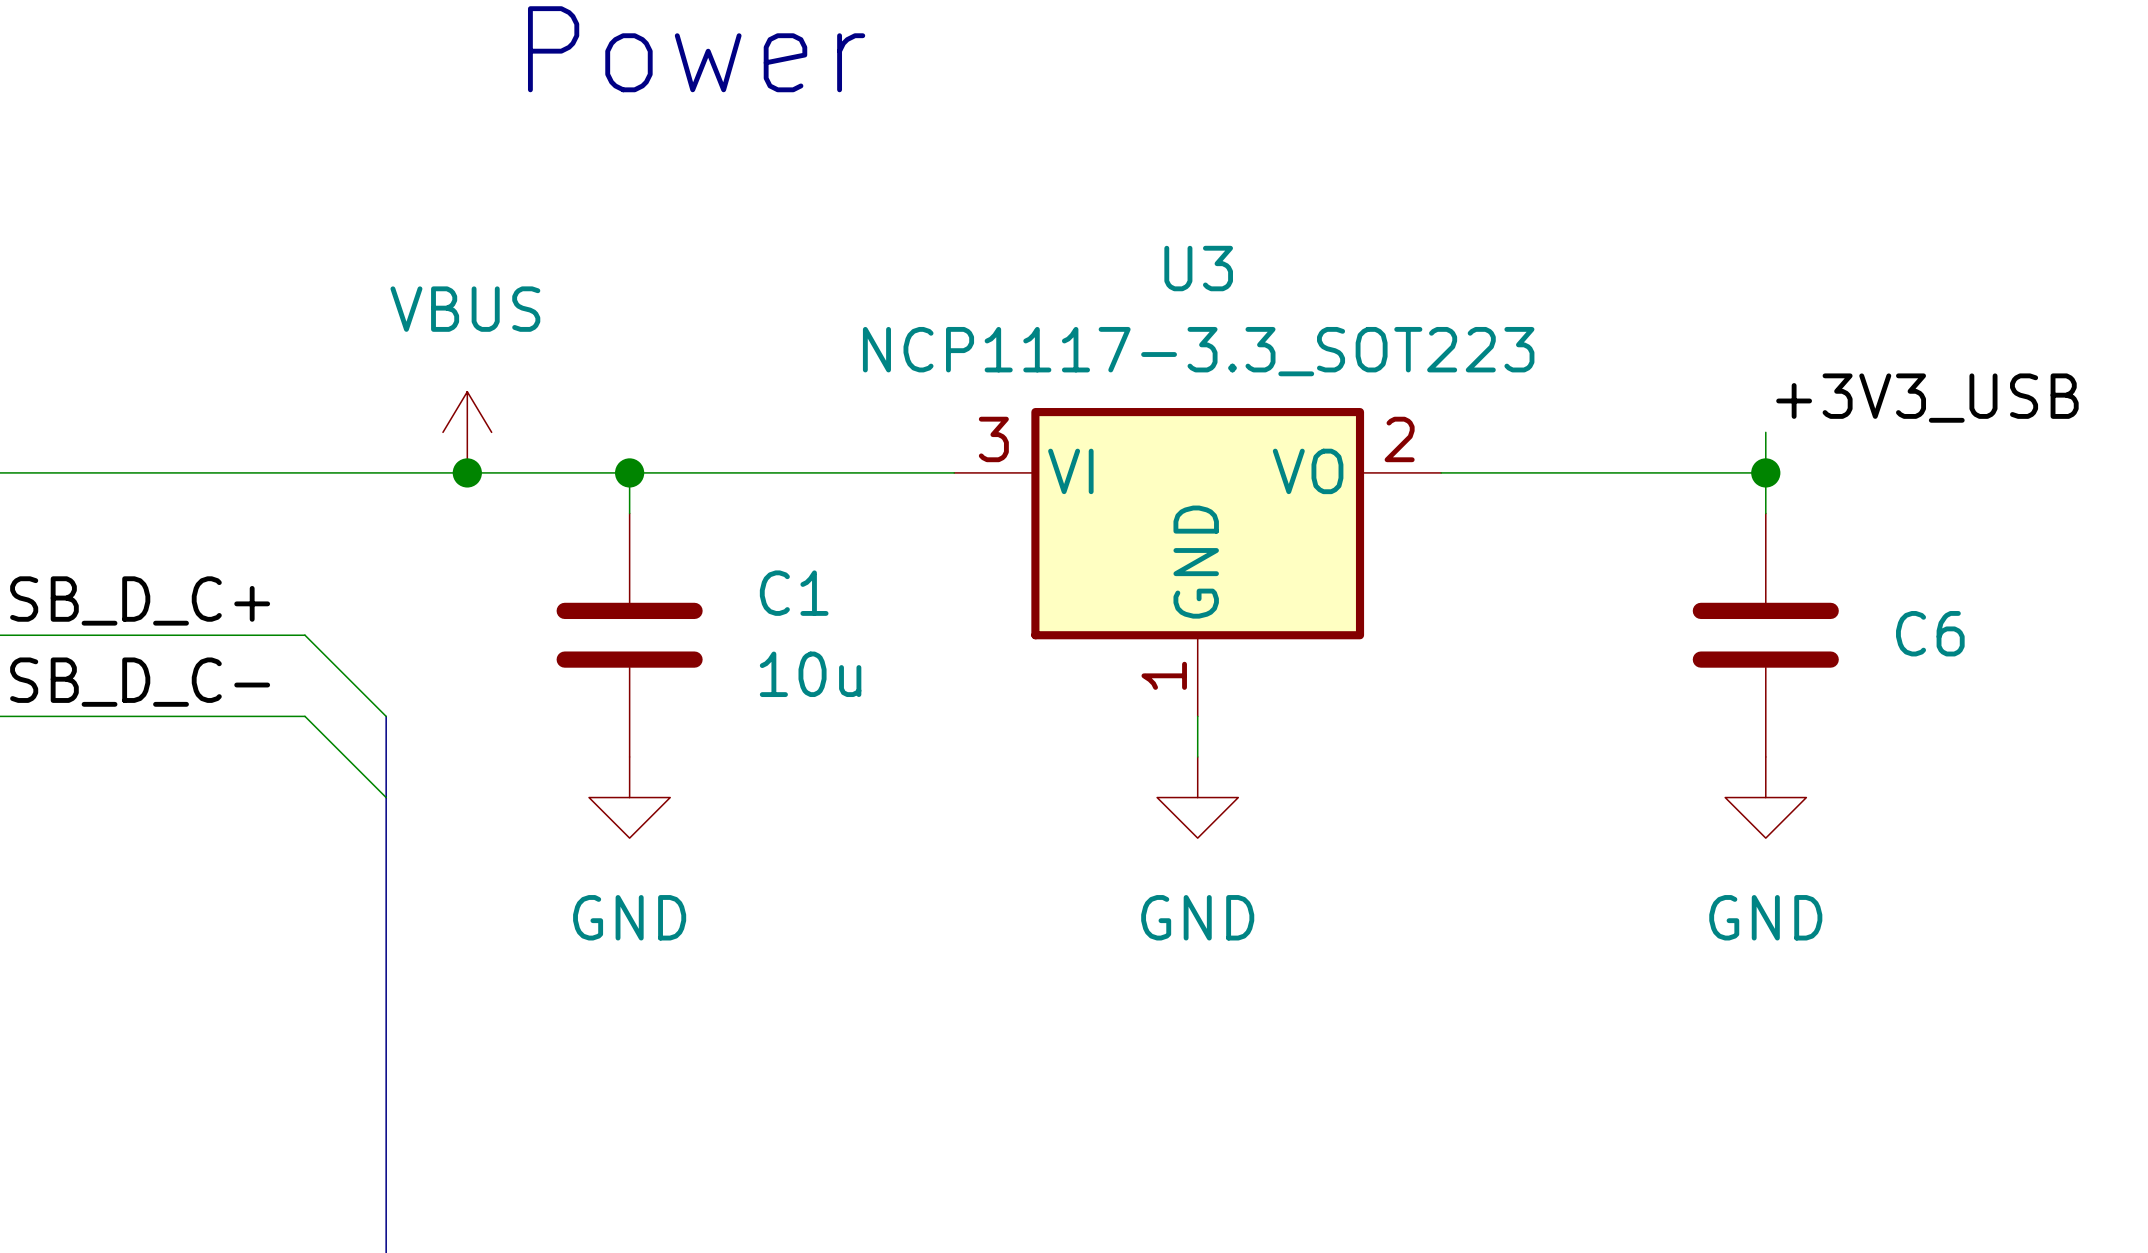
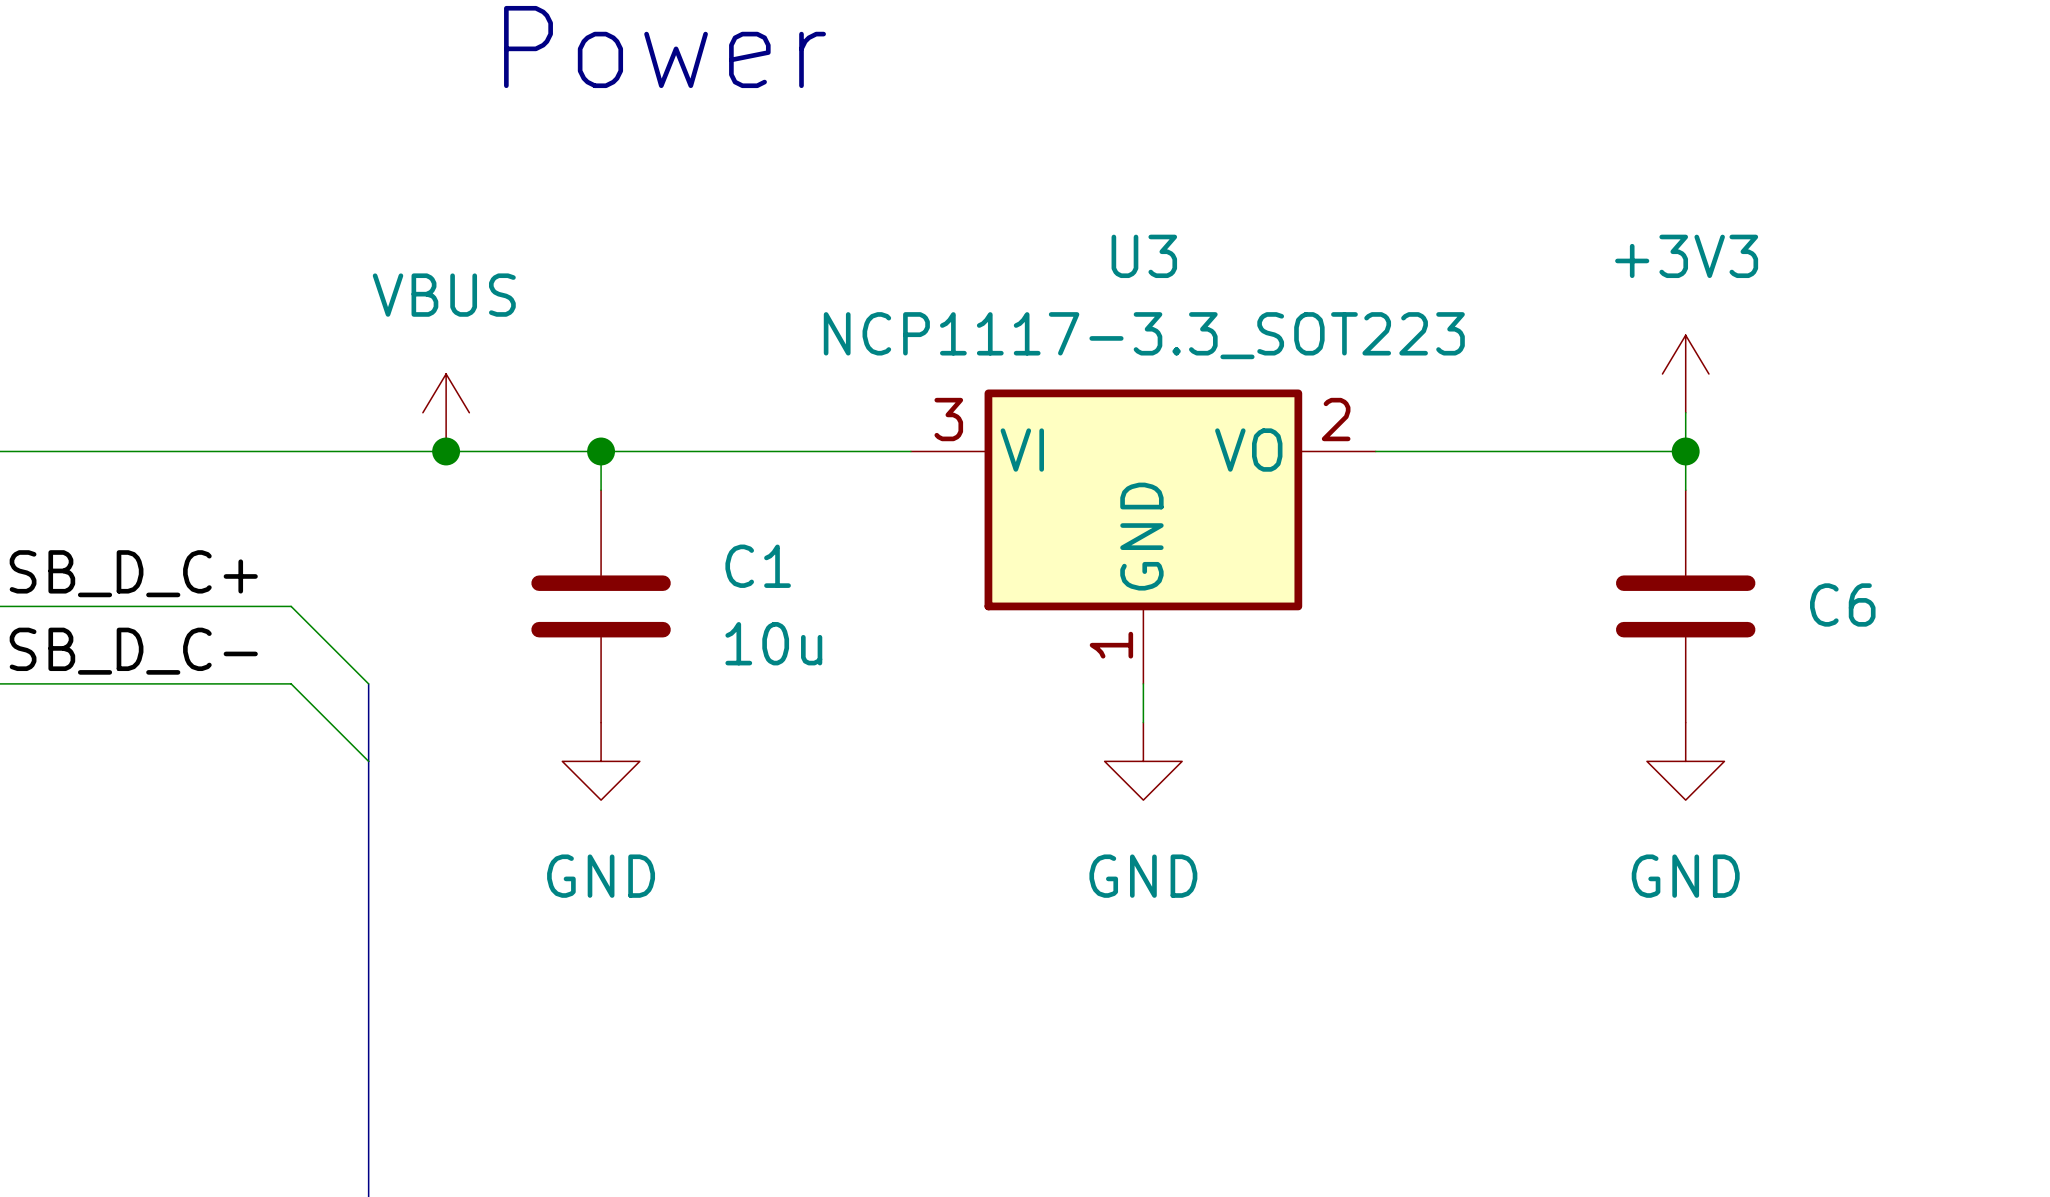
power symbol: none -> +3V3 (1685, 374)
label: +3V3_USB (1927, 398) -> none

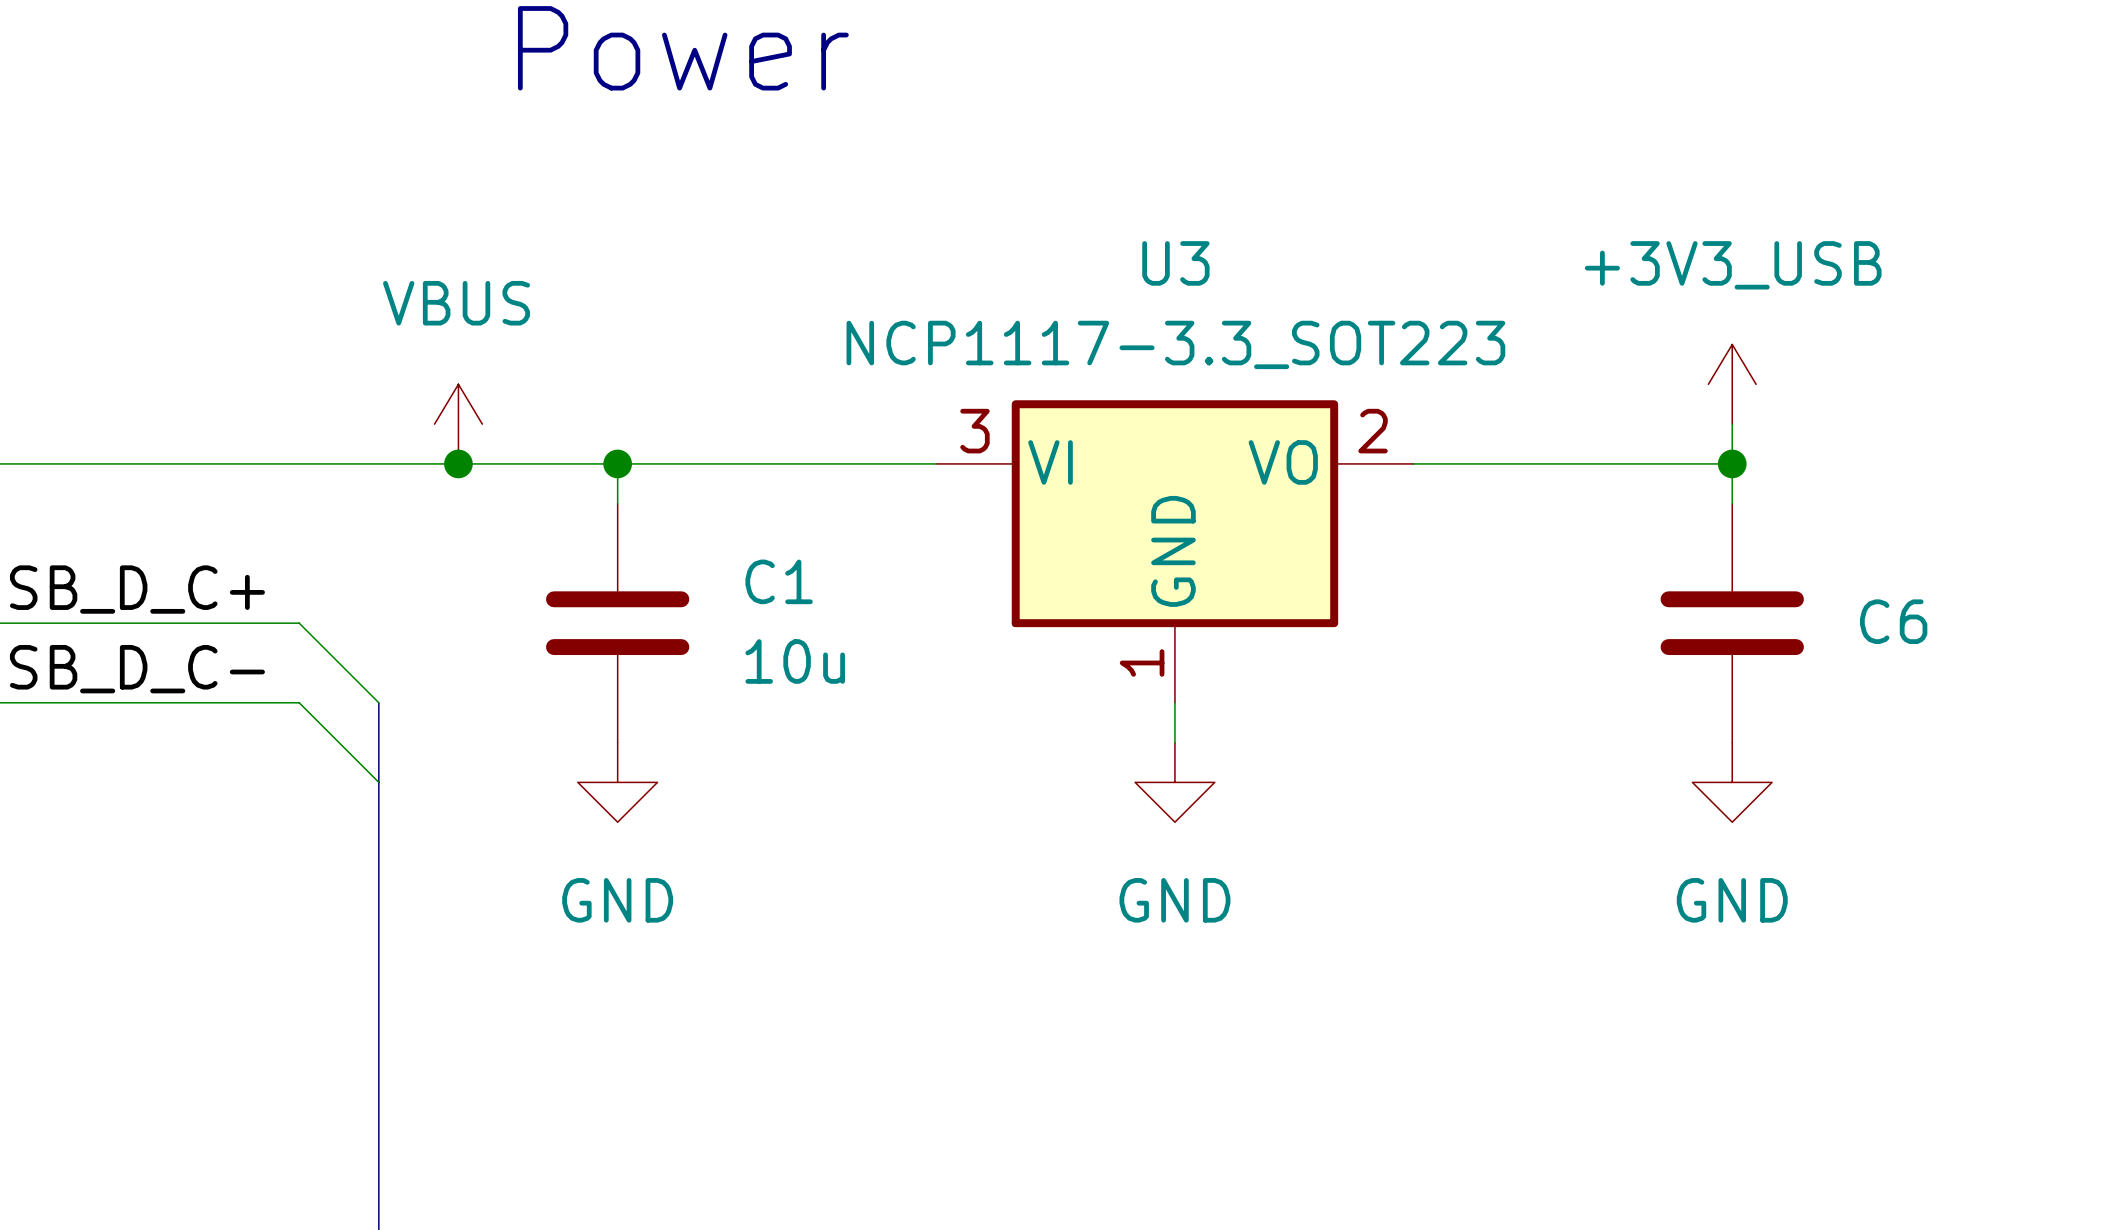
power symbol: +3V3 (1685, 374) -> +3V3_USB (1732, 384)

